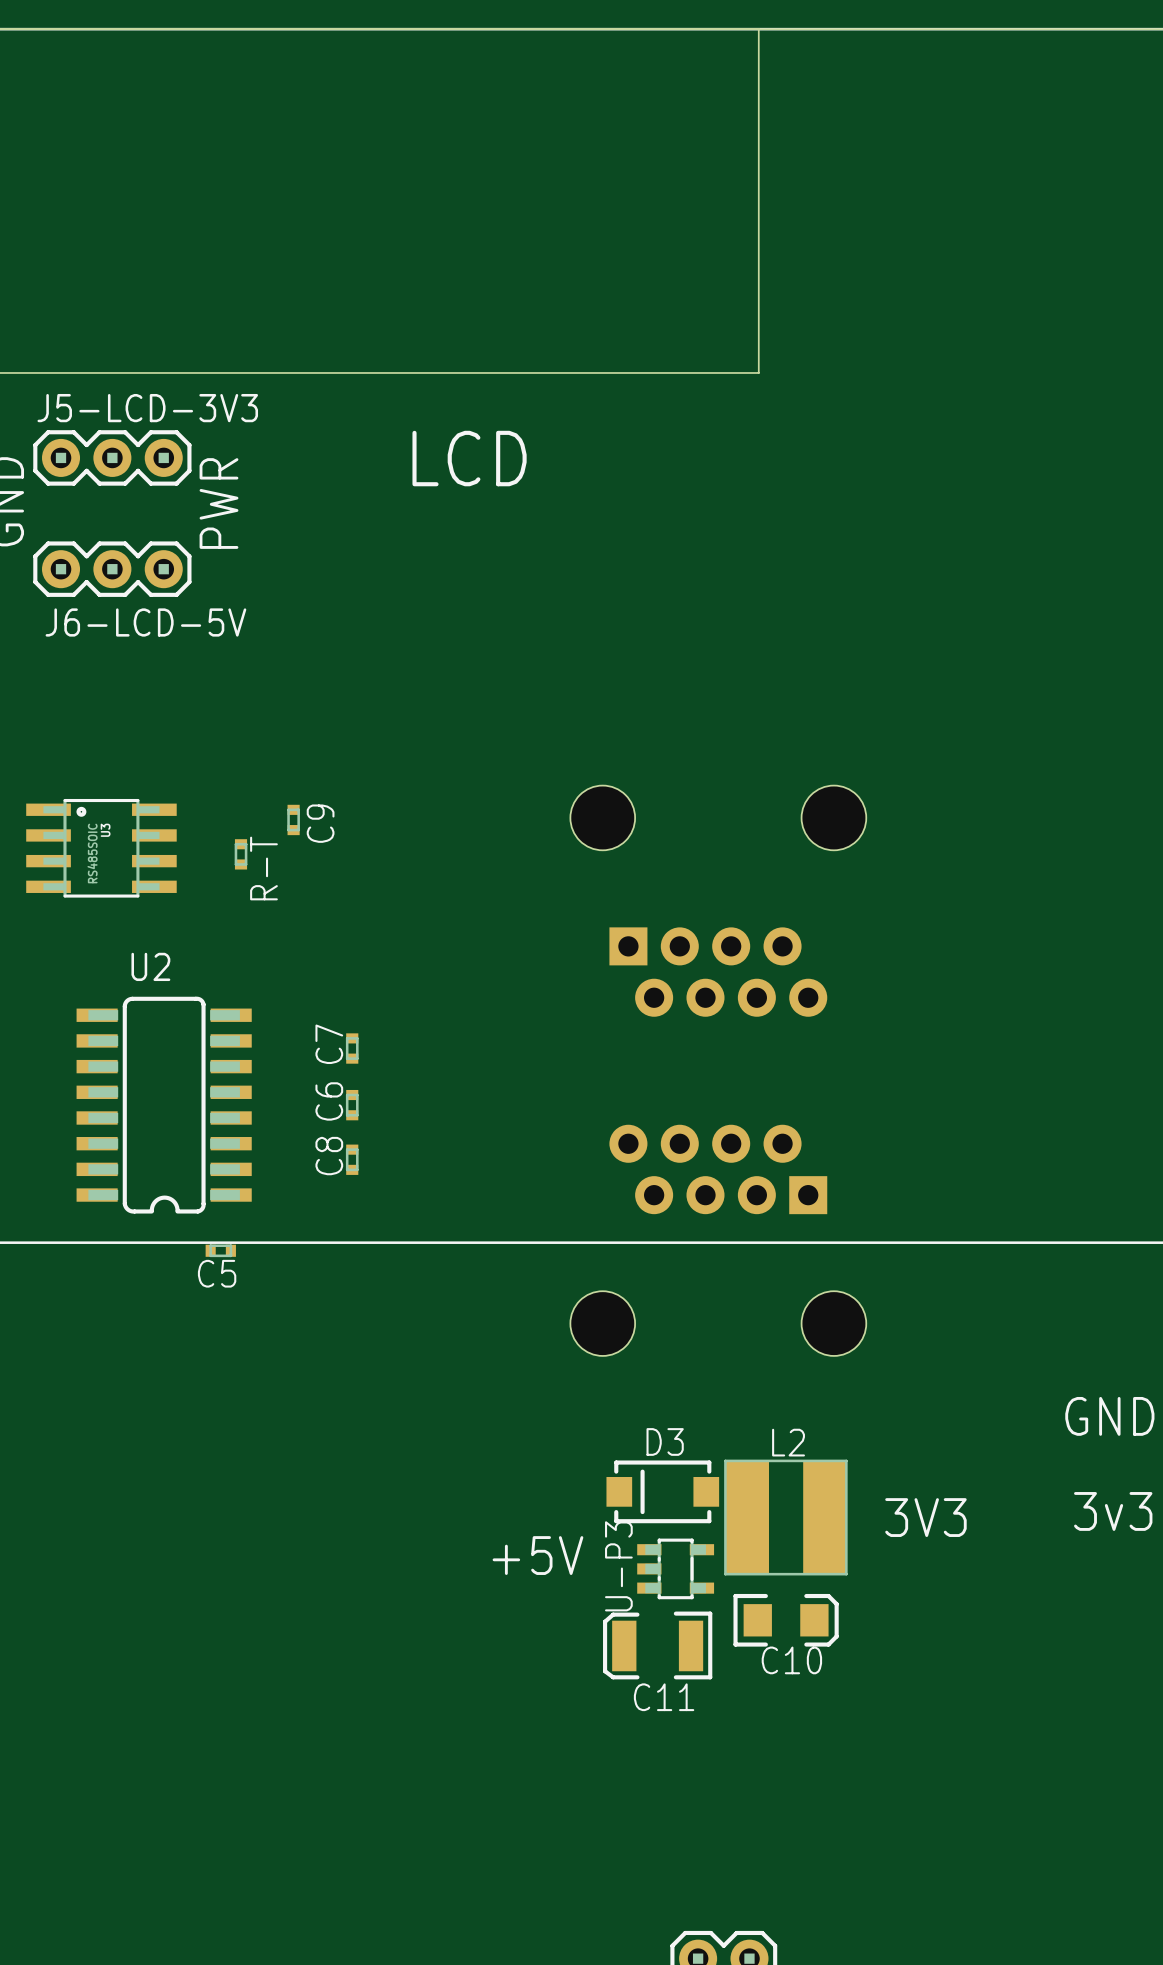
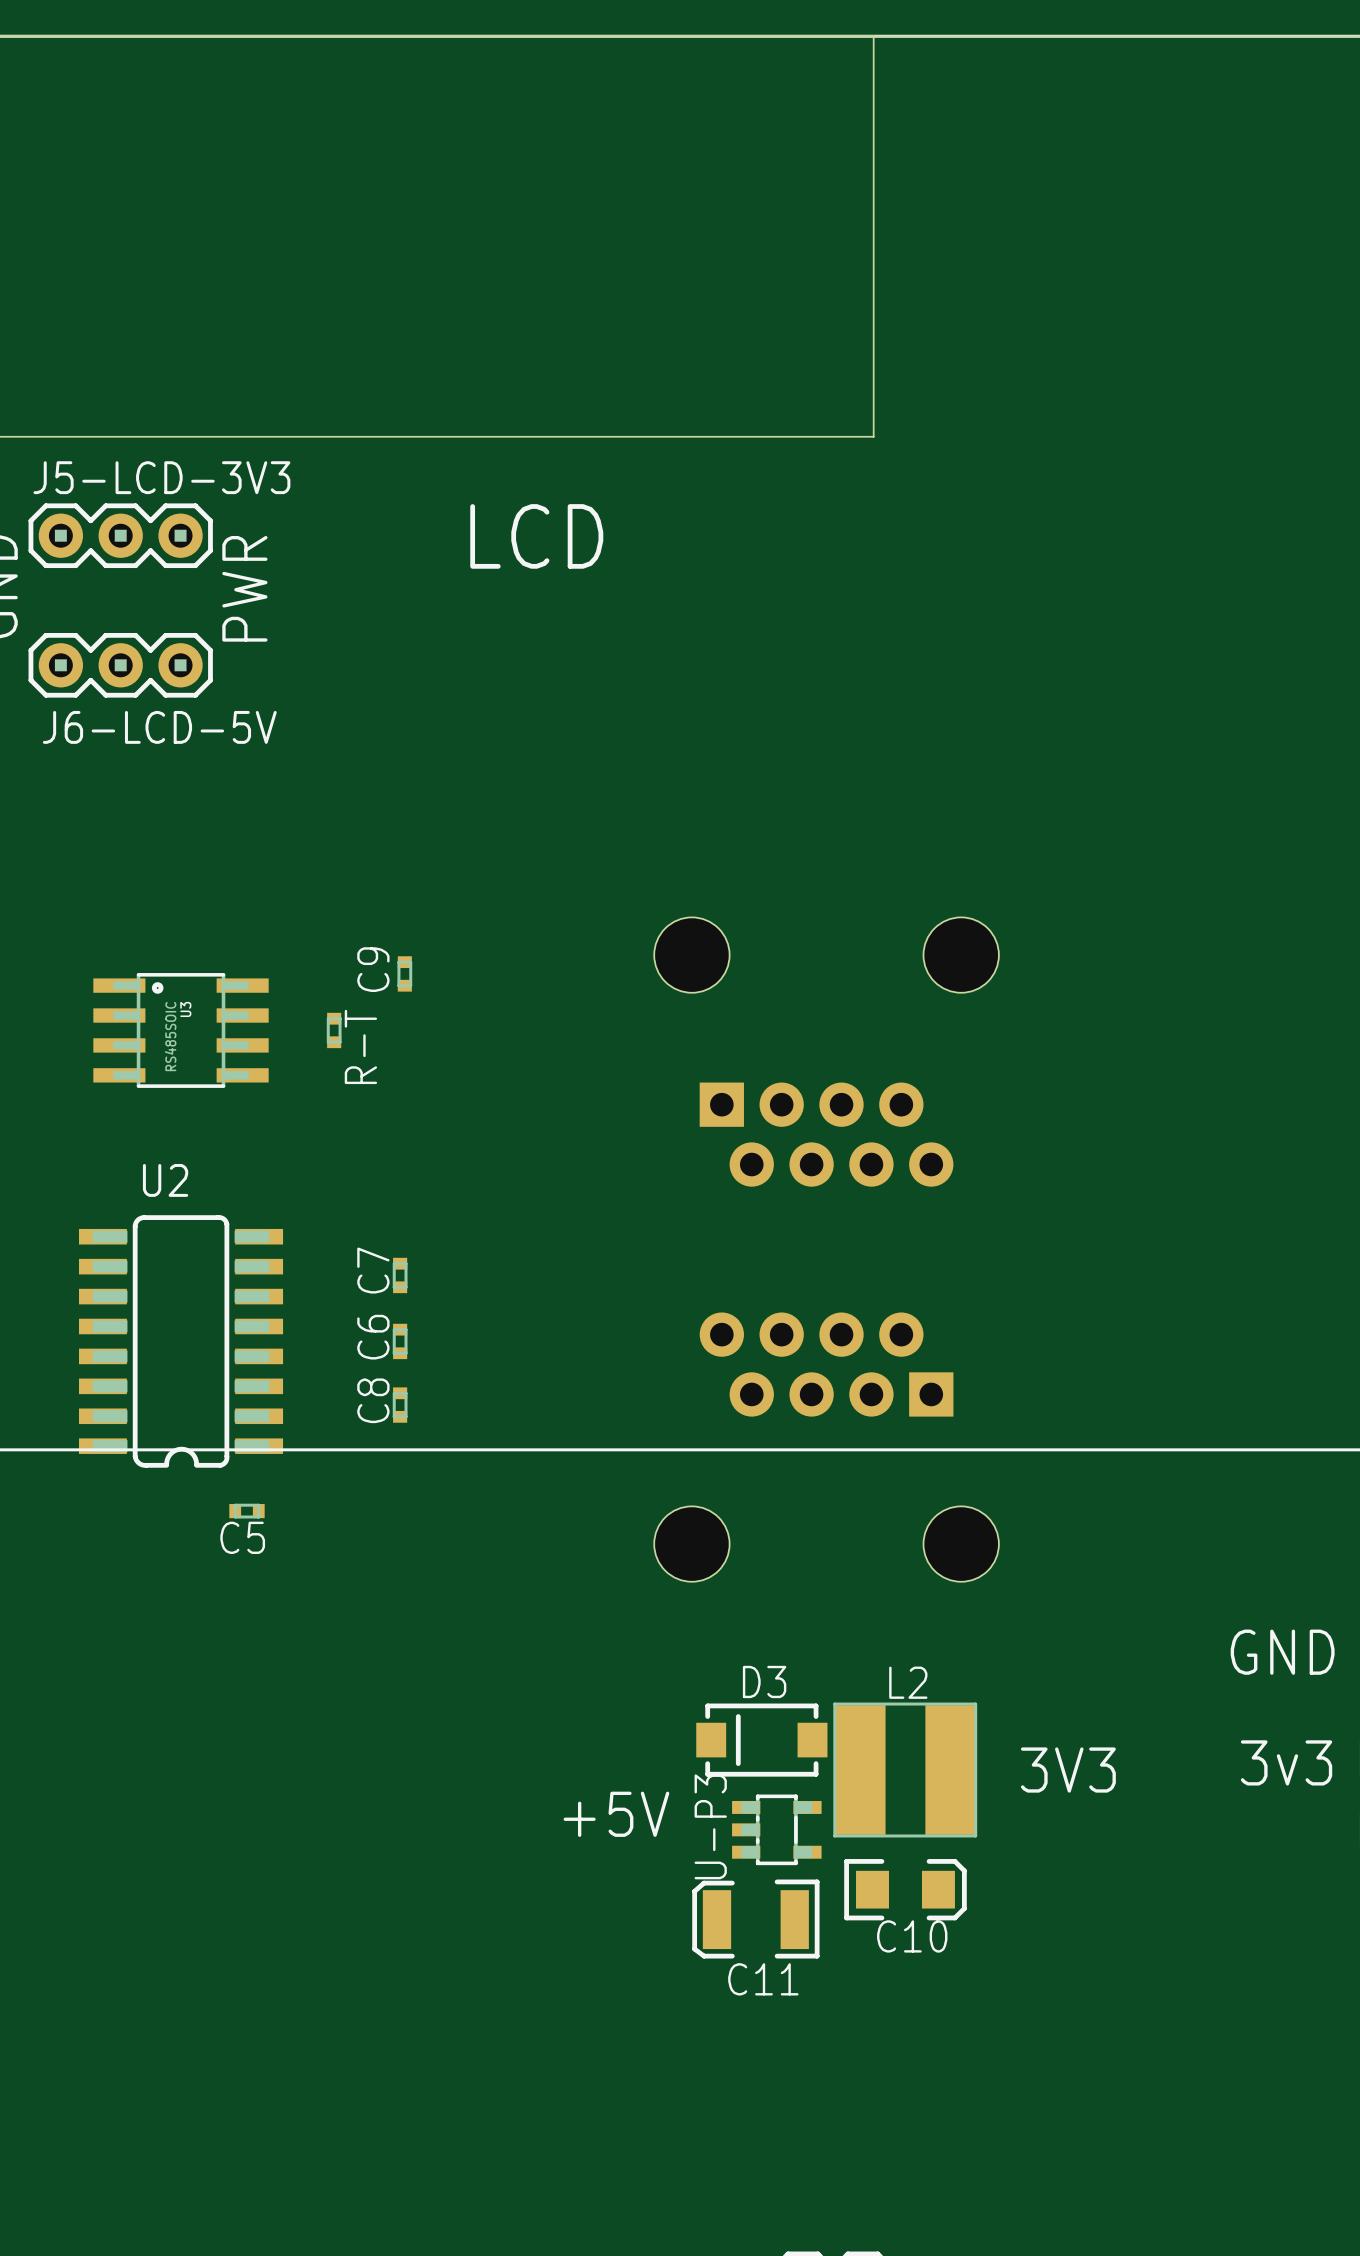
C9 rotation: 0° (293, 819) -> 180° (404, 973)
C9 position: (293, 819) -> (404, 973)
U3 position: (101, 848) -> (181, 1030)
R-T position: (241, 854) -> (334, 1030)
C7 position: (352, 1048) -> (400, 1275)
U2 position: (164, 1105) -> (181, 1341)
C6 position: (352, 1105) -> (400, 1341)
C8 position: (352, 1159) -> (400, 1405)
C5 position: (220, 1250) -> (246, 1511)

